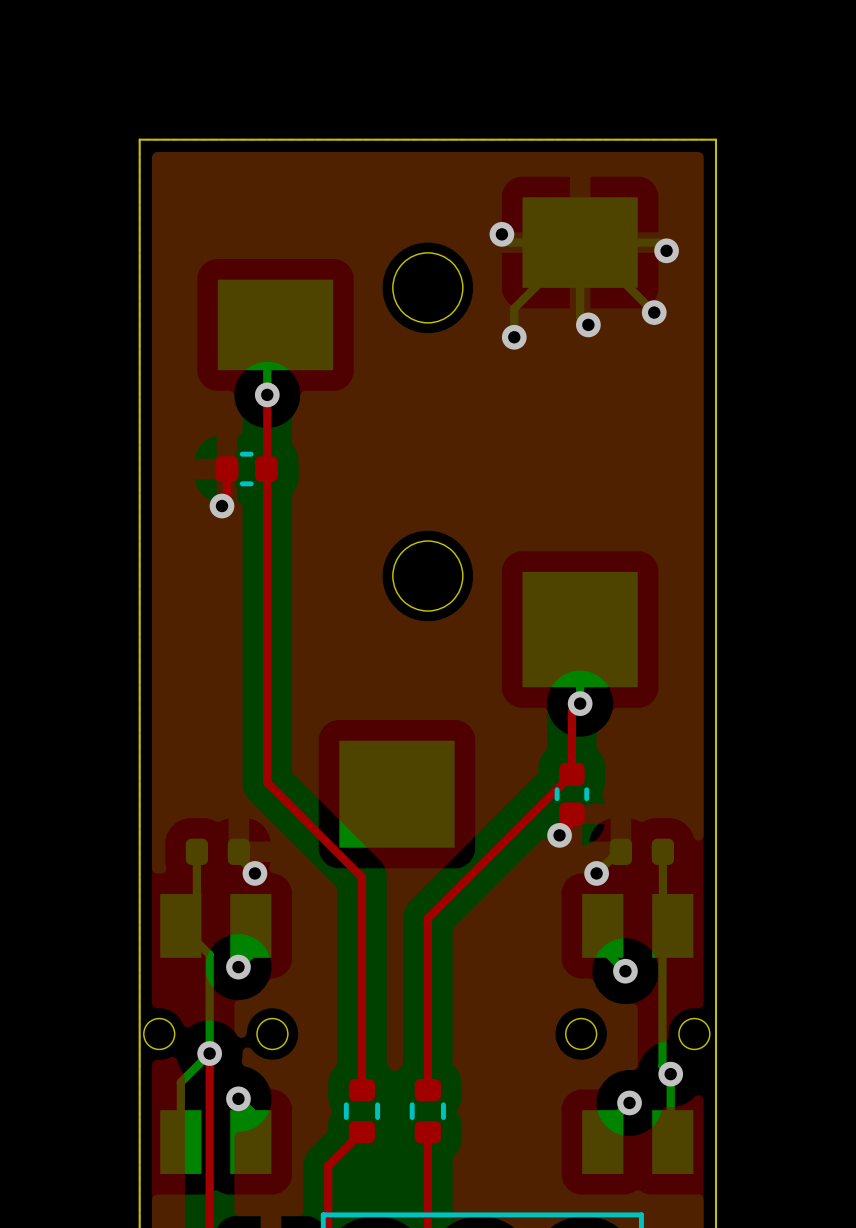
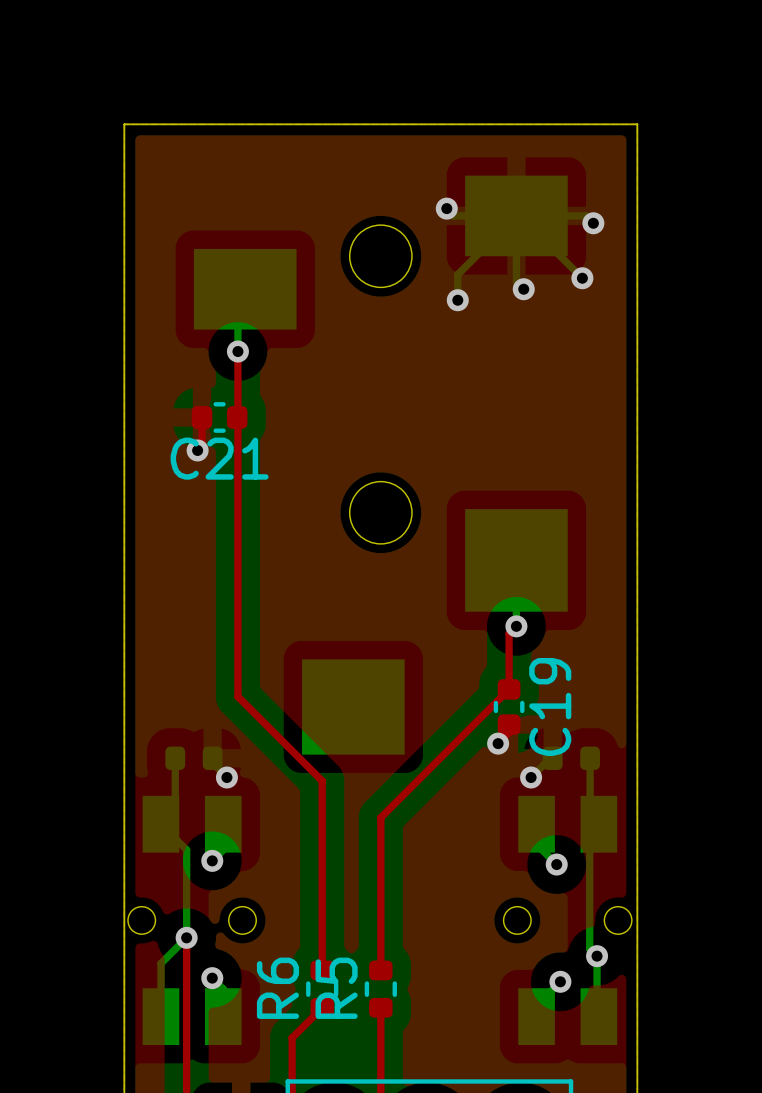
C21 name: none -> C21 (219, 458)
C19 name: none -> C19 (550, 706)
R6 name: none -> R6 (277, 988)
R5 name: none -> R5 (336, 988)

